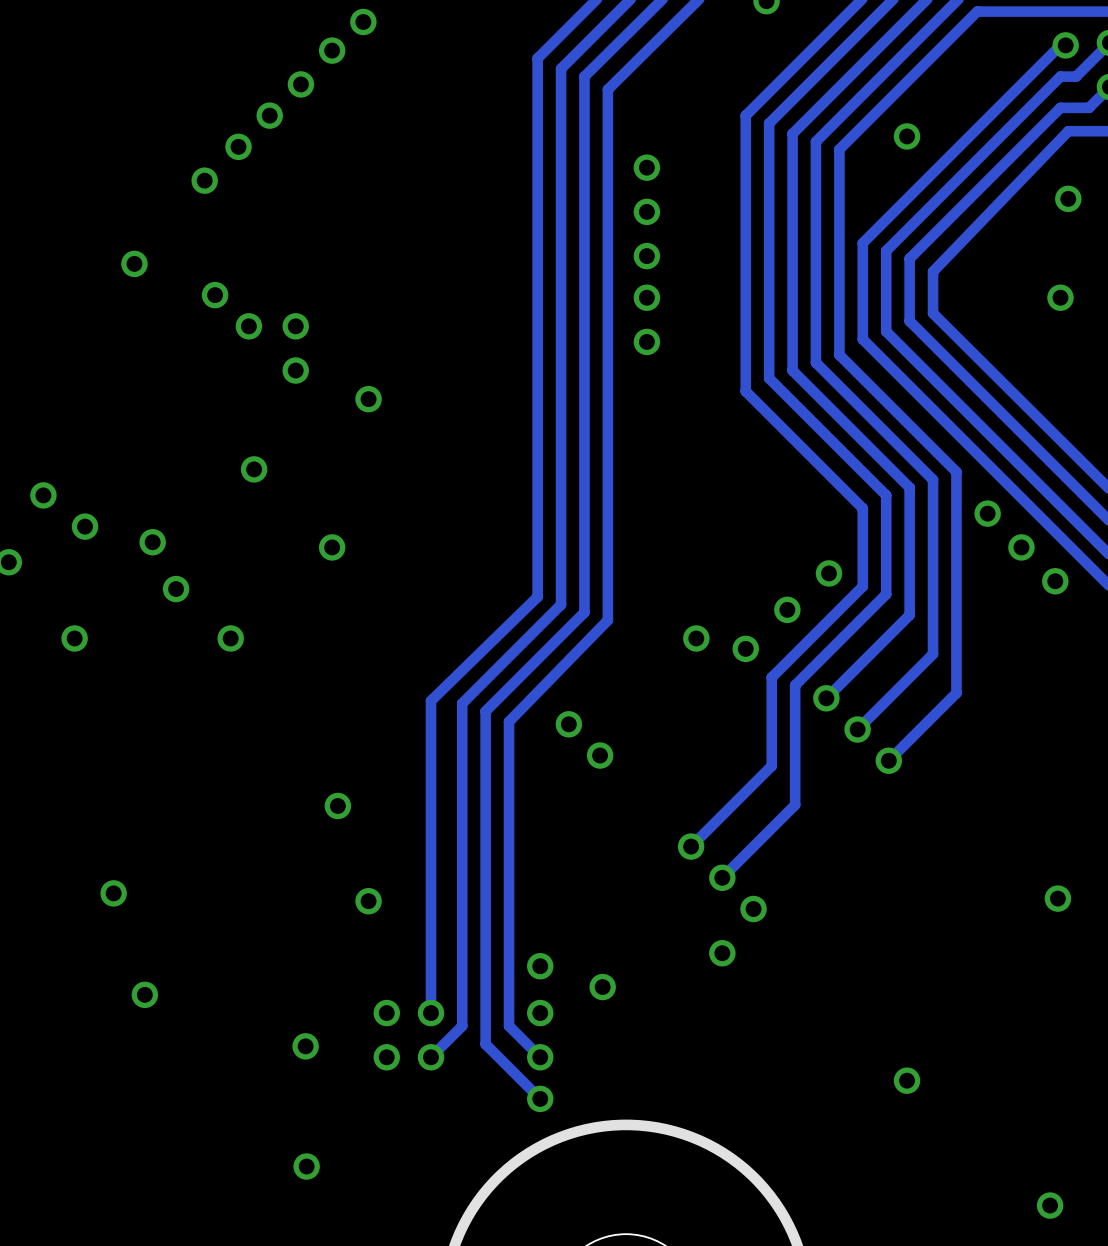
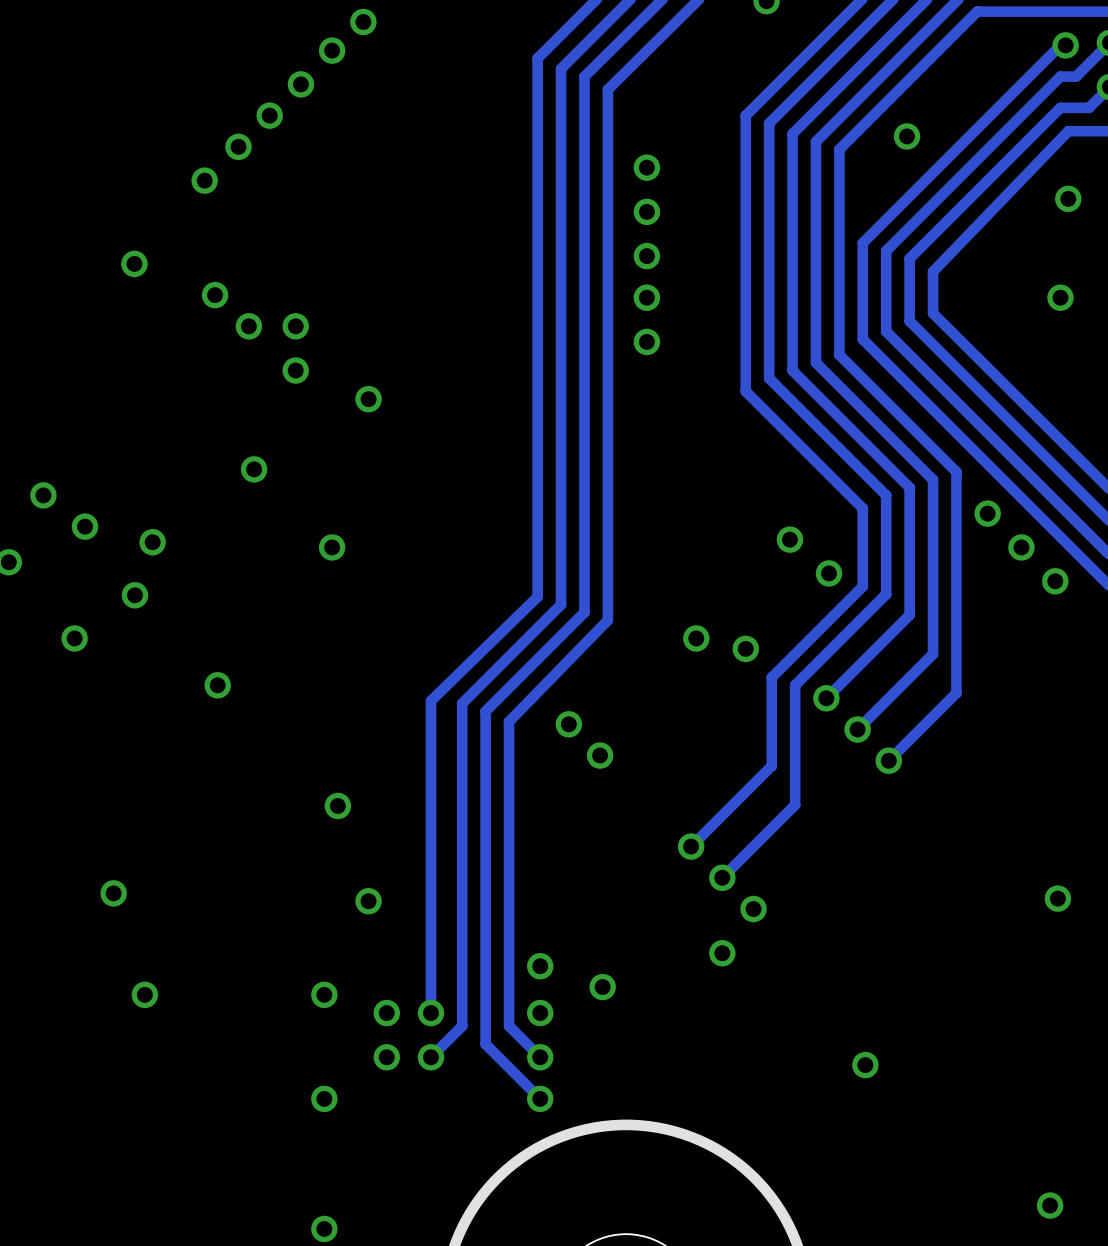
via position: (176, 589) -> (134, 595)
via position: (787, 609) -> (789, 539)
via position: (230, 638) -> (217, 685)
via: none -> (324, 994)
via: (305, 1046) -> none
via position: (907, 1080) -> (865, 1065)
via: none -> (324, 1098)
via: (306, 1166) -> none
via: none -> (324, 1228)

